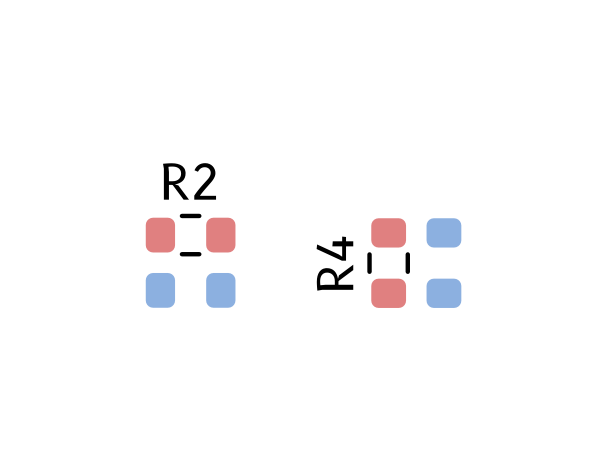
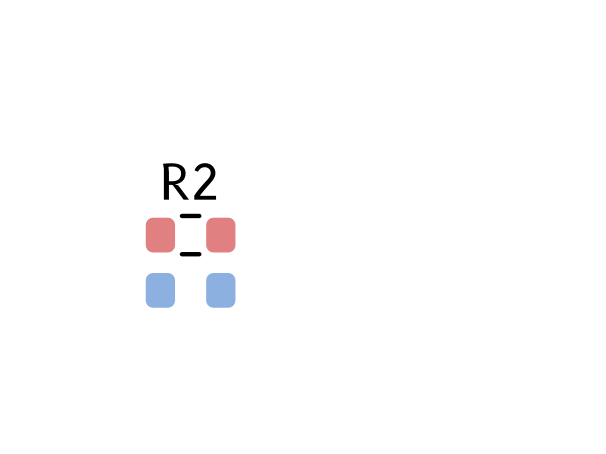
R4: (388, 263) -> none
part: (443, 263) -> none

